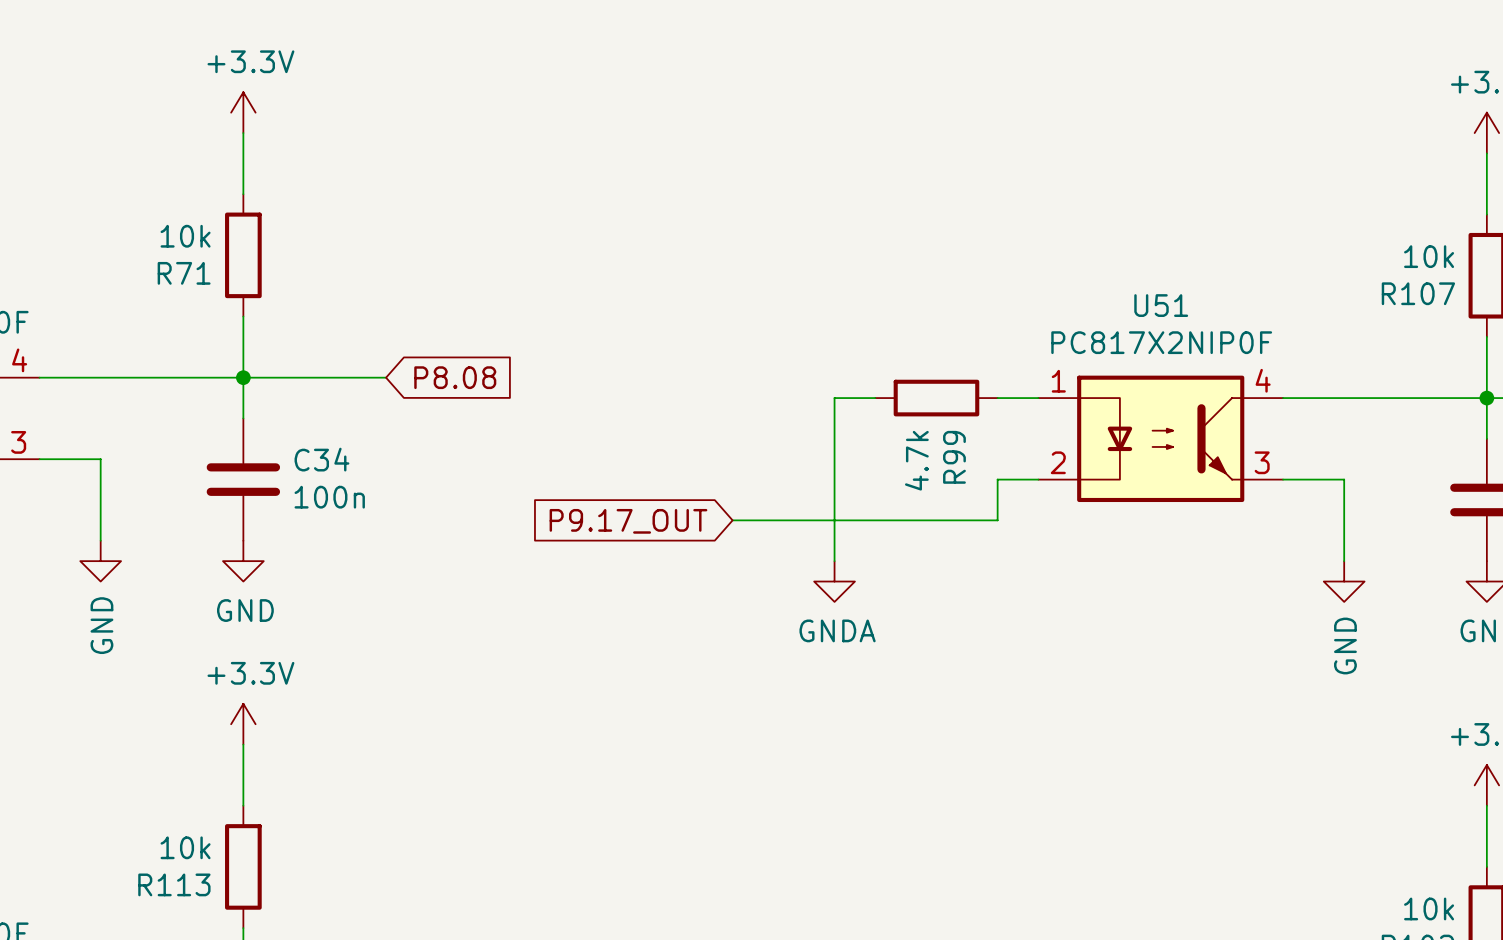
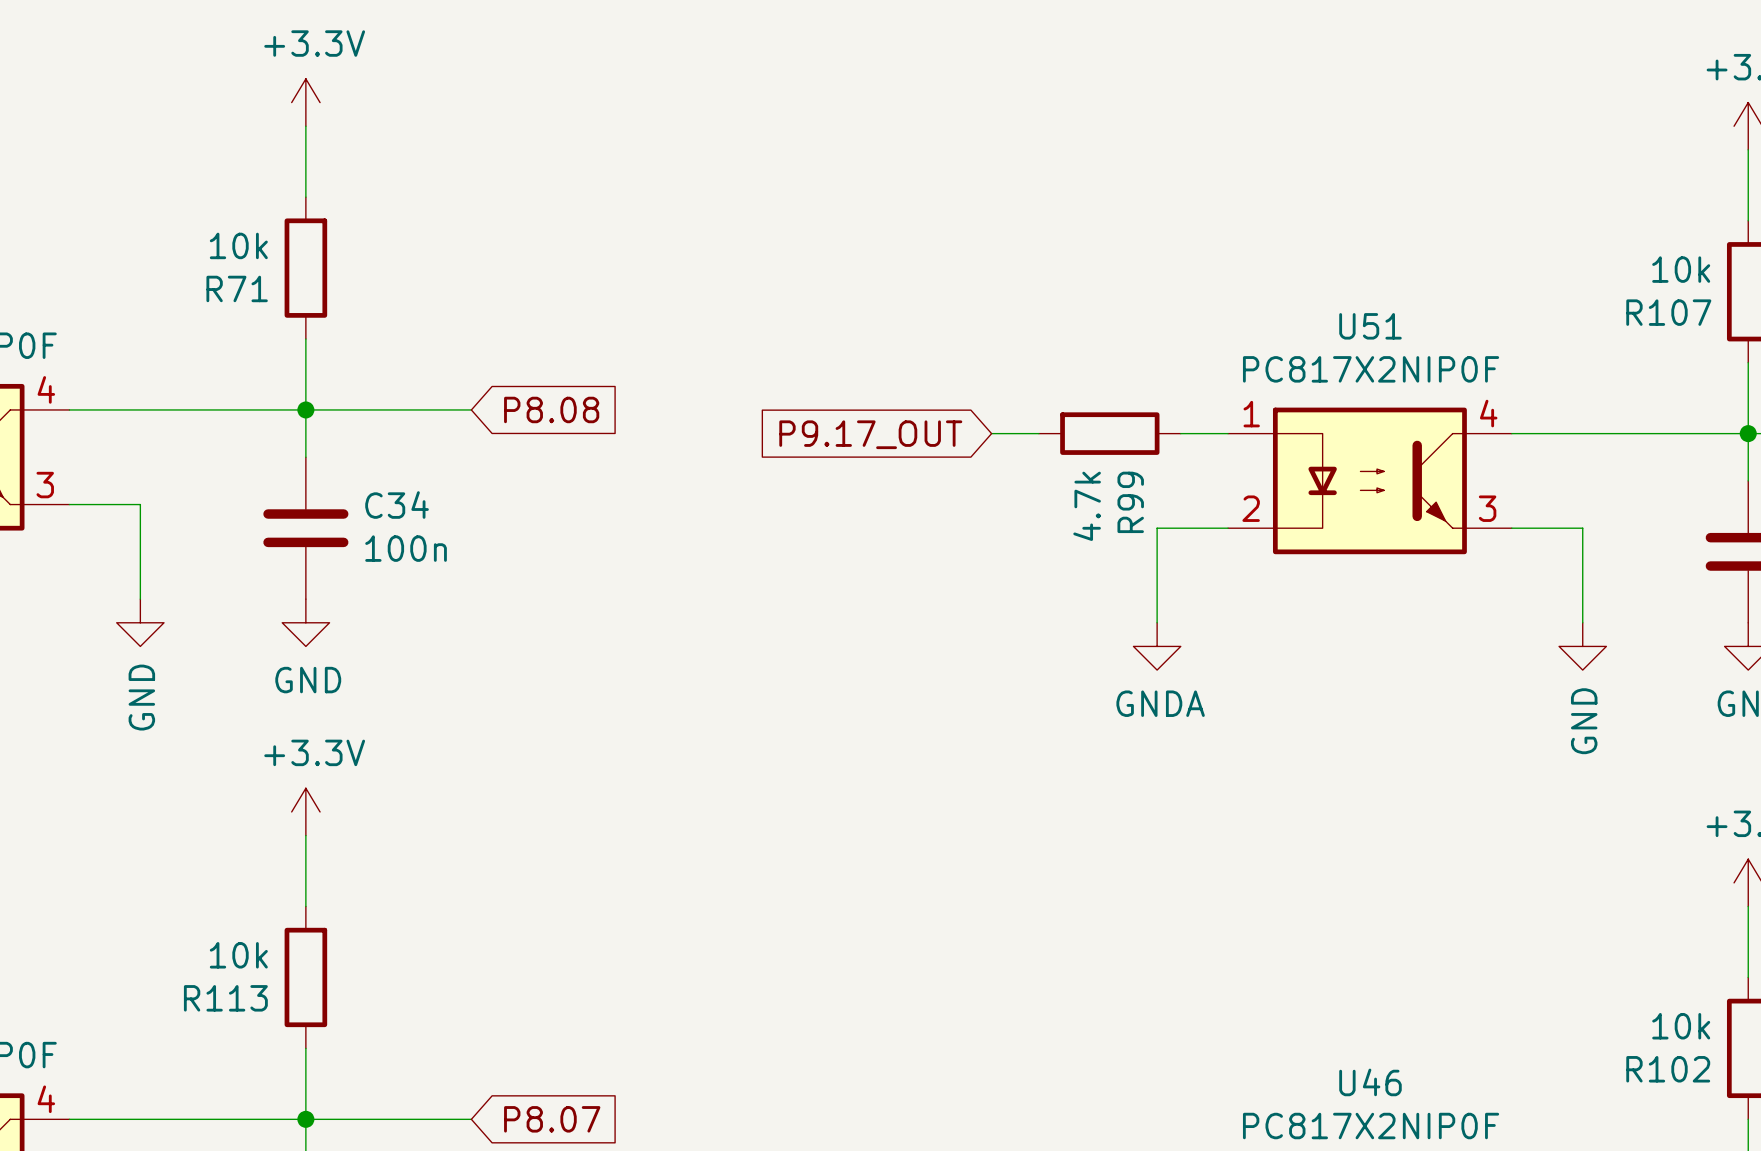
wire: (834, 398) (834, 561) -> none
wire: (997, 479) (997, 520) (732, 520) -> (1180, 528) (1157, 528) (1157, 622)
global label position: P9.17_OUT (628, 521) -> P9.17_OUT (870, 434)
power symbol position: GNDA (834, 581) -> GNDA (1157, 646)

